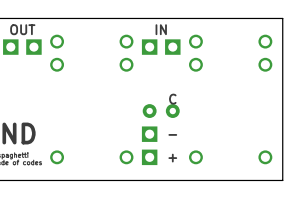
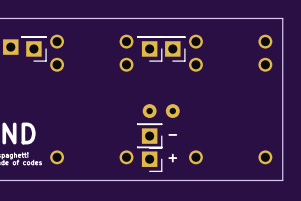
text: OUT (22, 29) -> none
text: IN (161, 29) -> none
part side: top (33, 47) -> bottom (33, 48)
part side: top (149, 47) -> bottom (149, 48)
part side: top (172, 47) -> bottom (172, 48)
text: C (172, 99) -> none
part side: top (149, 134) -> bottom (149, 136)
part side: top (149, 157) -> bottom (149, 159)

